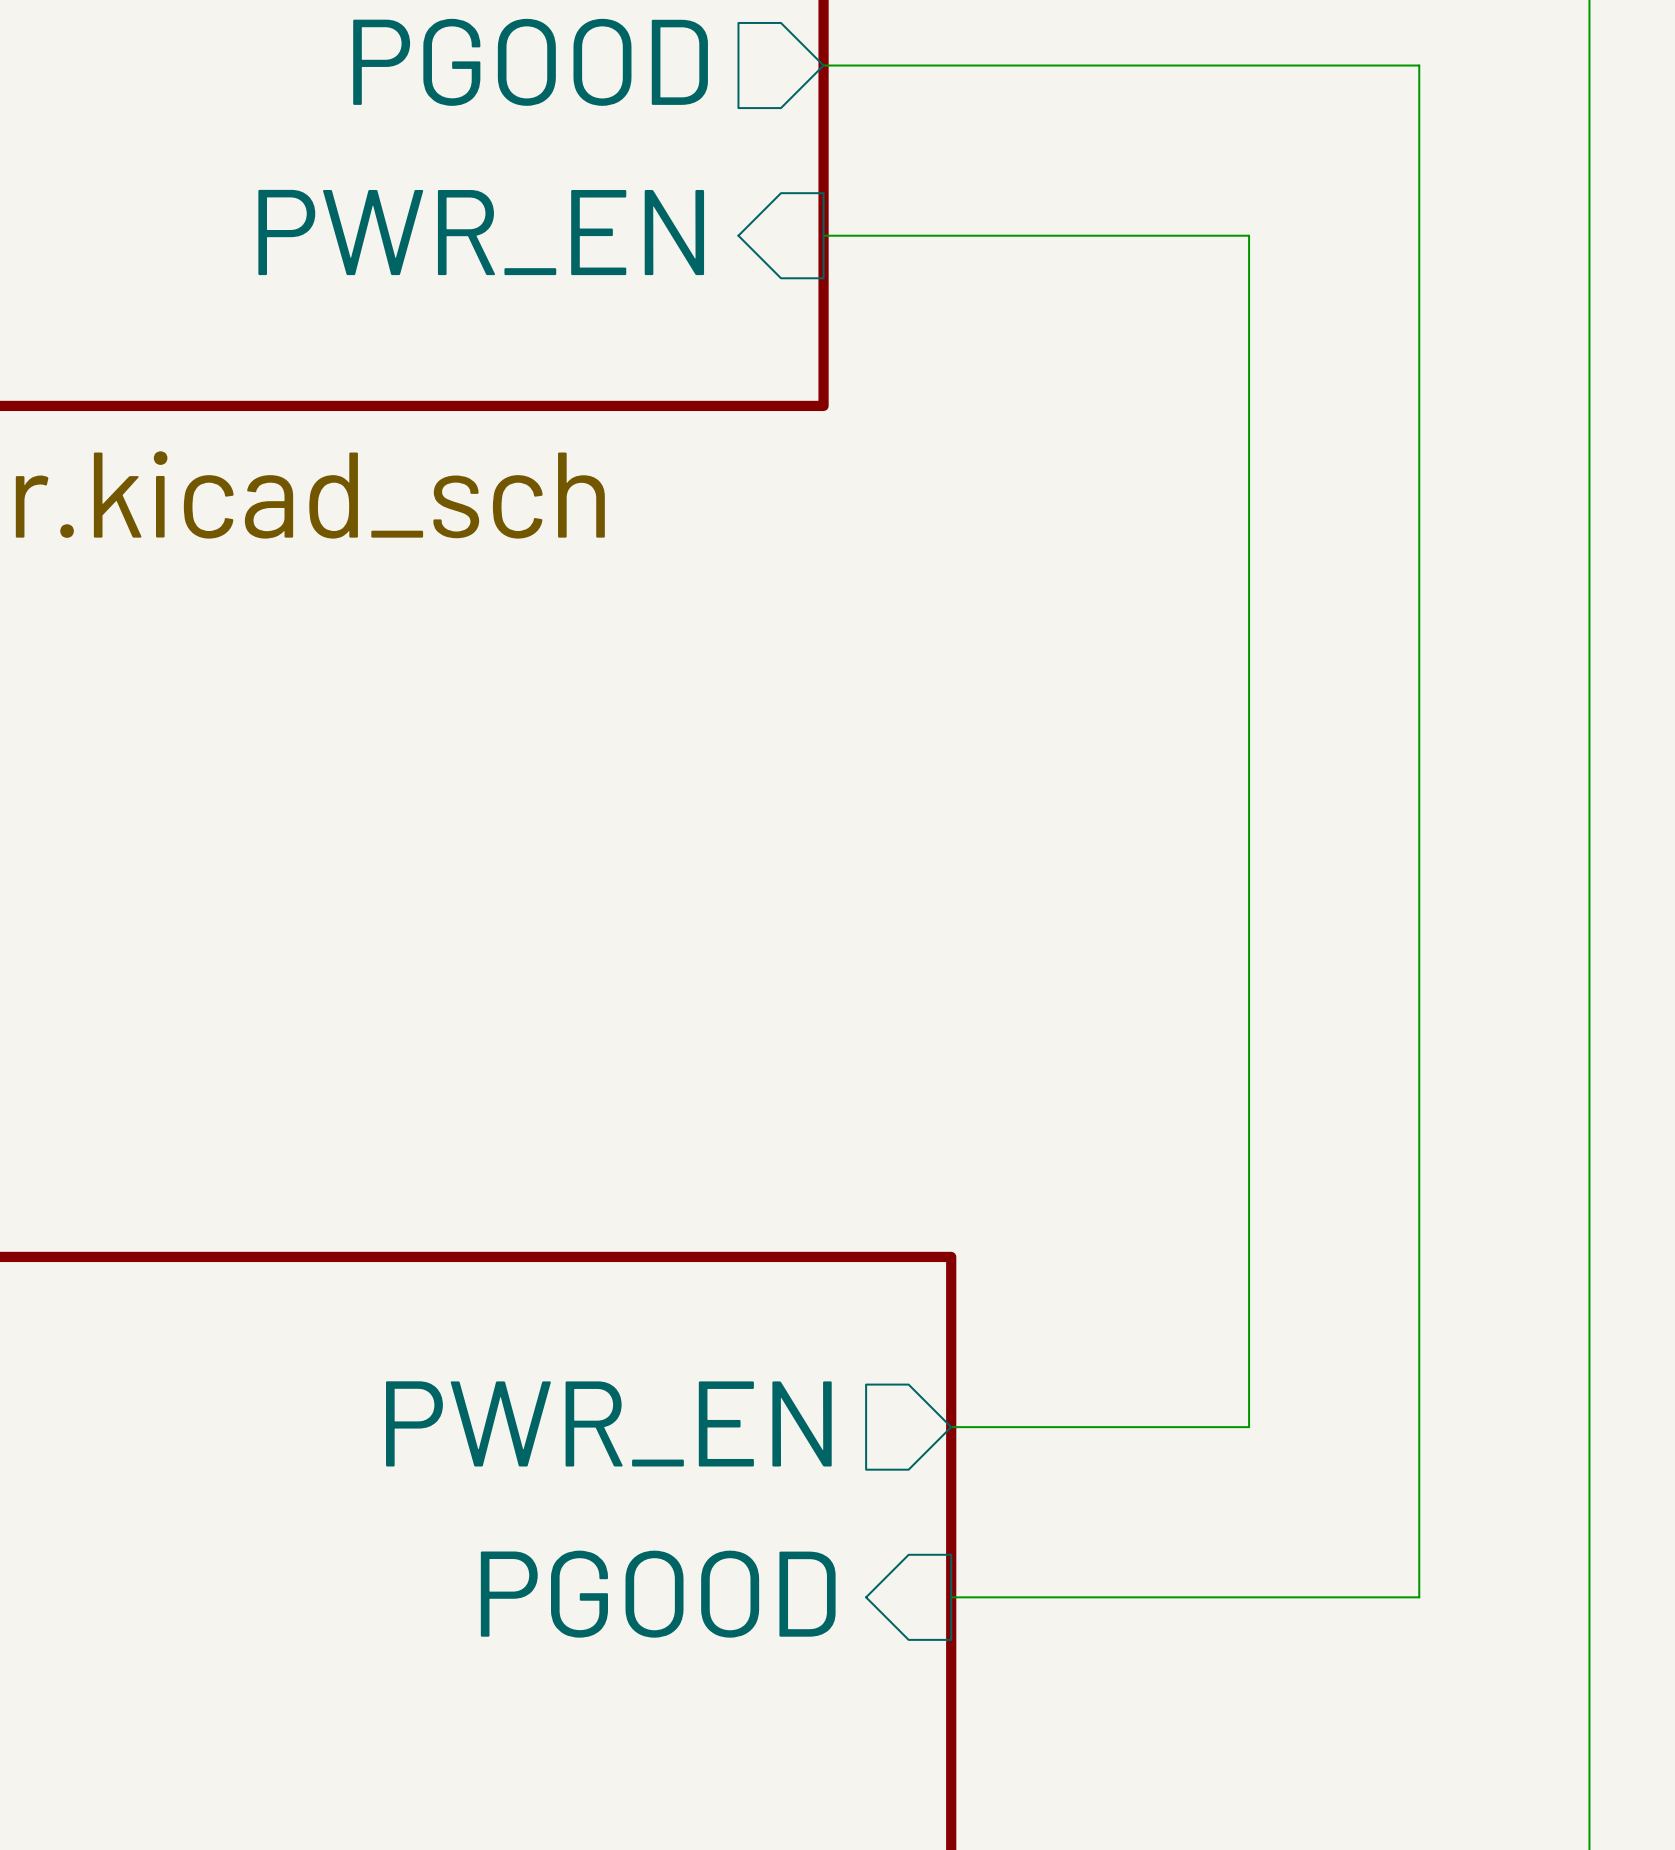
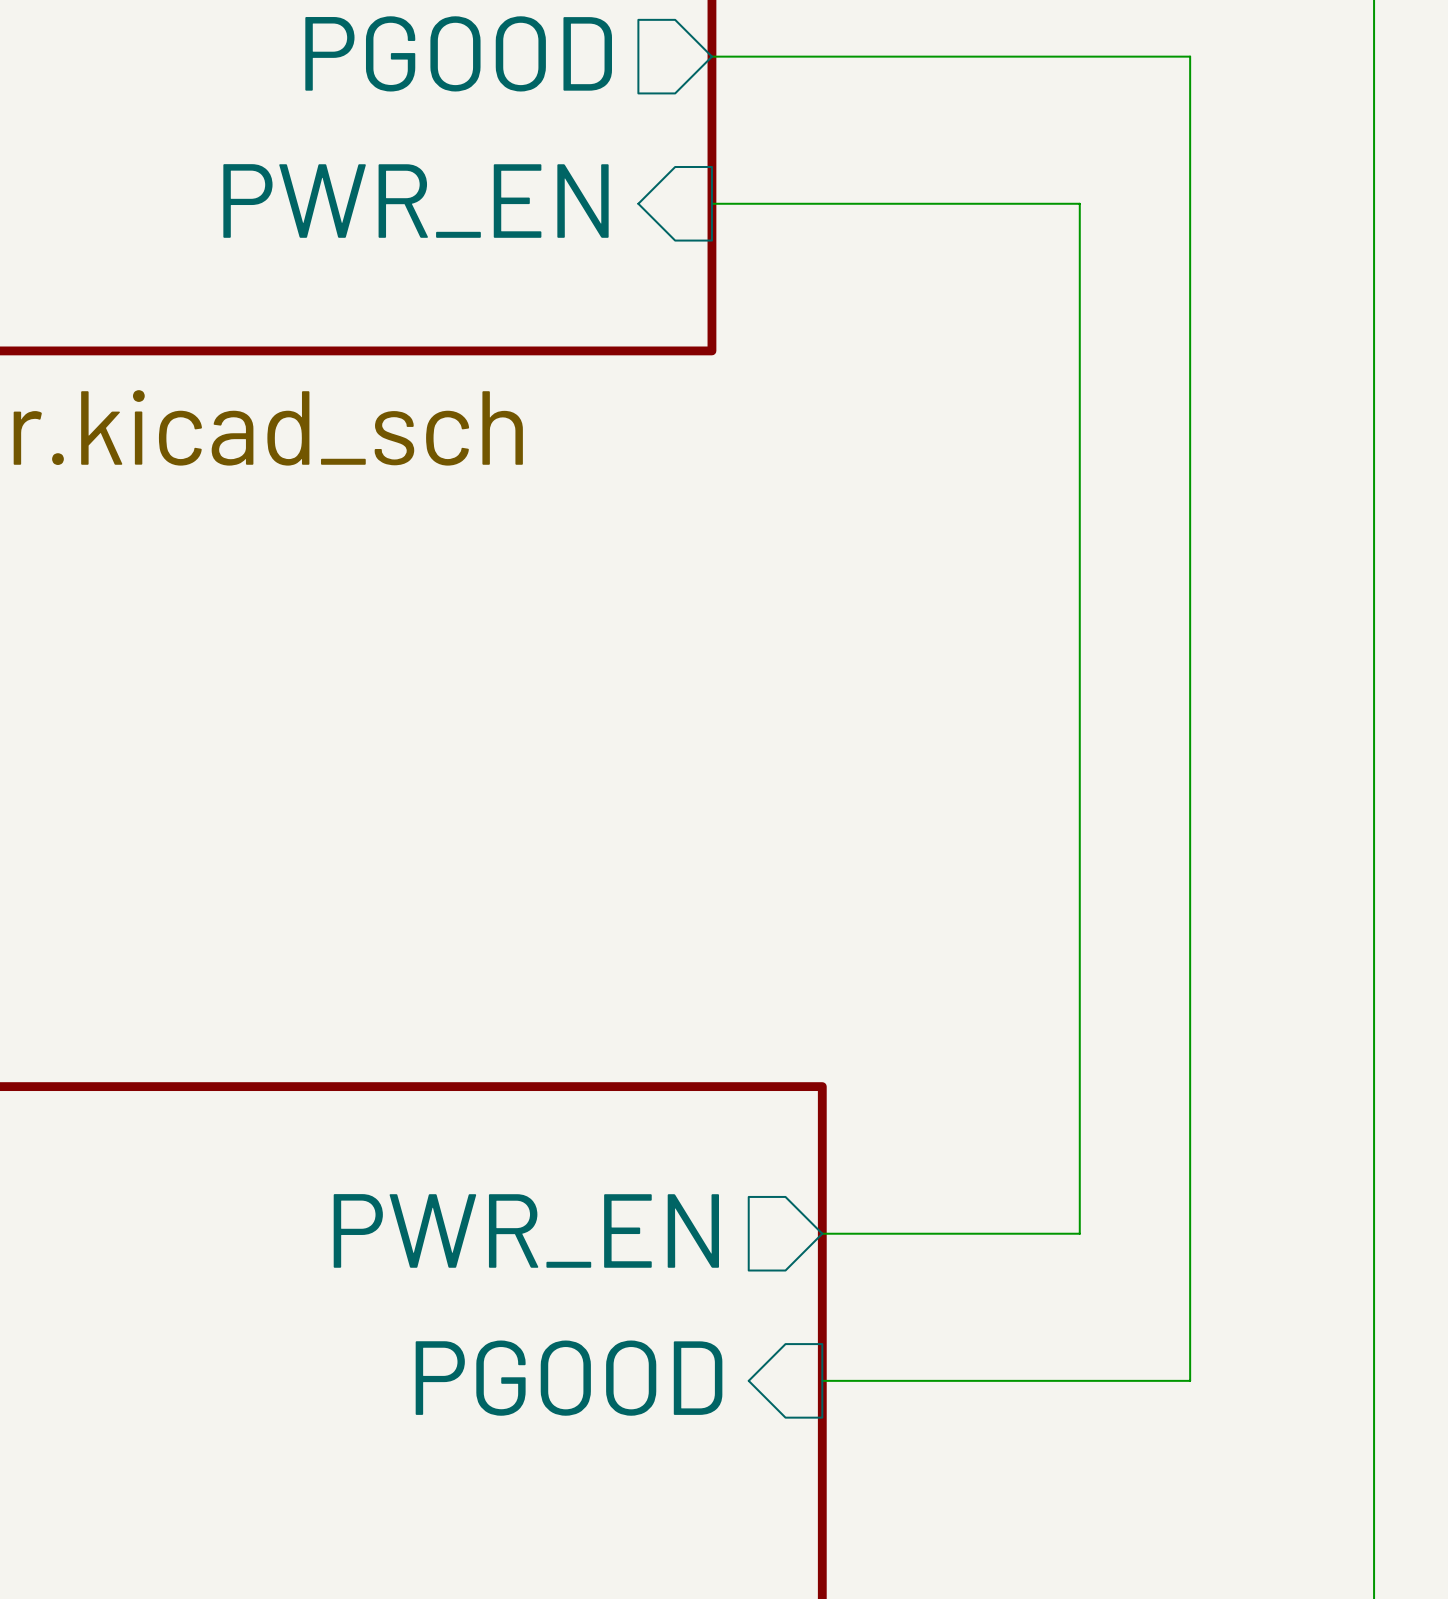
wire: (1376, 65) (1419, 65) (1419, 1597) (1376, 1597) -> (1190, 56) (1190, 1380)

